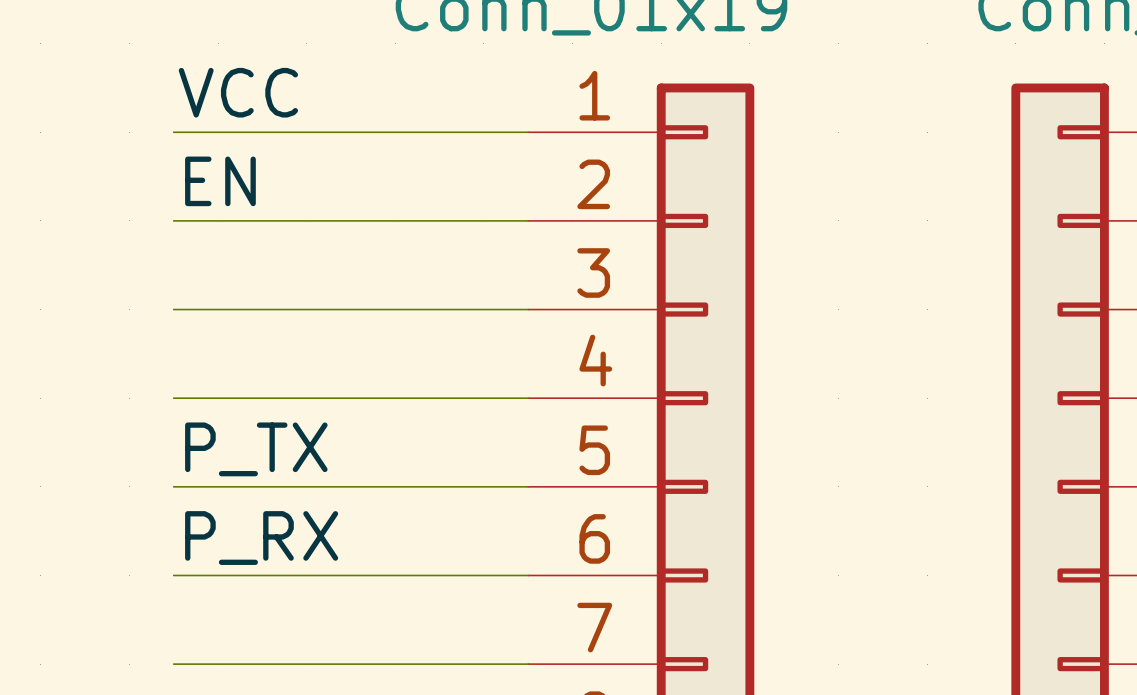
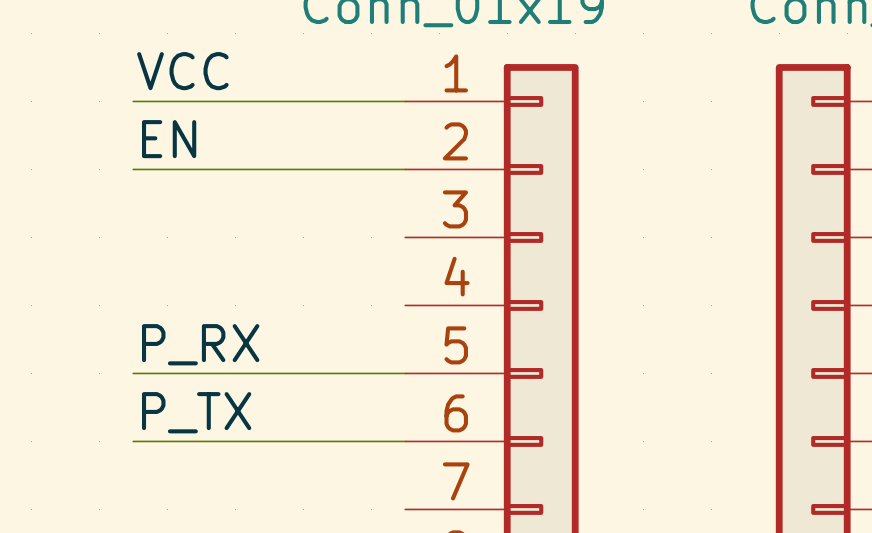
wire: (173, 309) (528, 309) -> none
wire: (173, 398) (528, 398) -> none
label: P_TX (256, 449) -> P_RX (200, 344)
label: P_RX (261, 538) -> P_TX (196, 412)
wire: (173, 664) (528, 664) -> none

